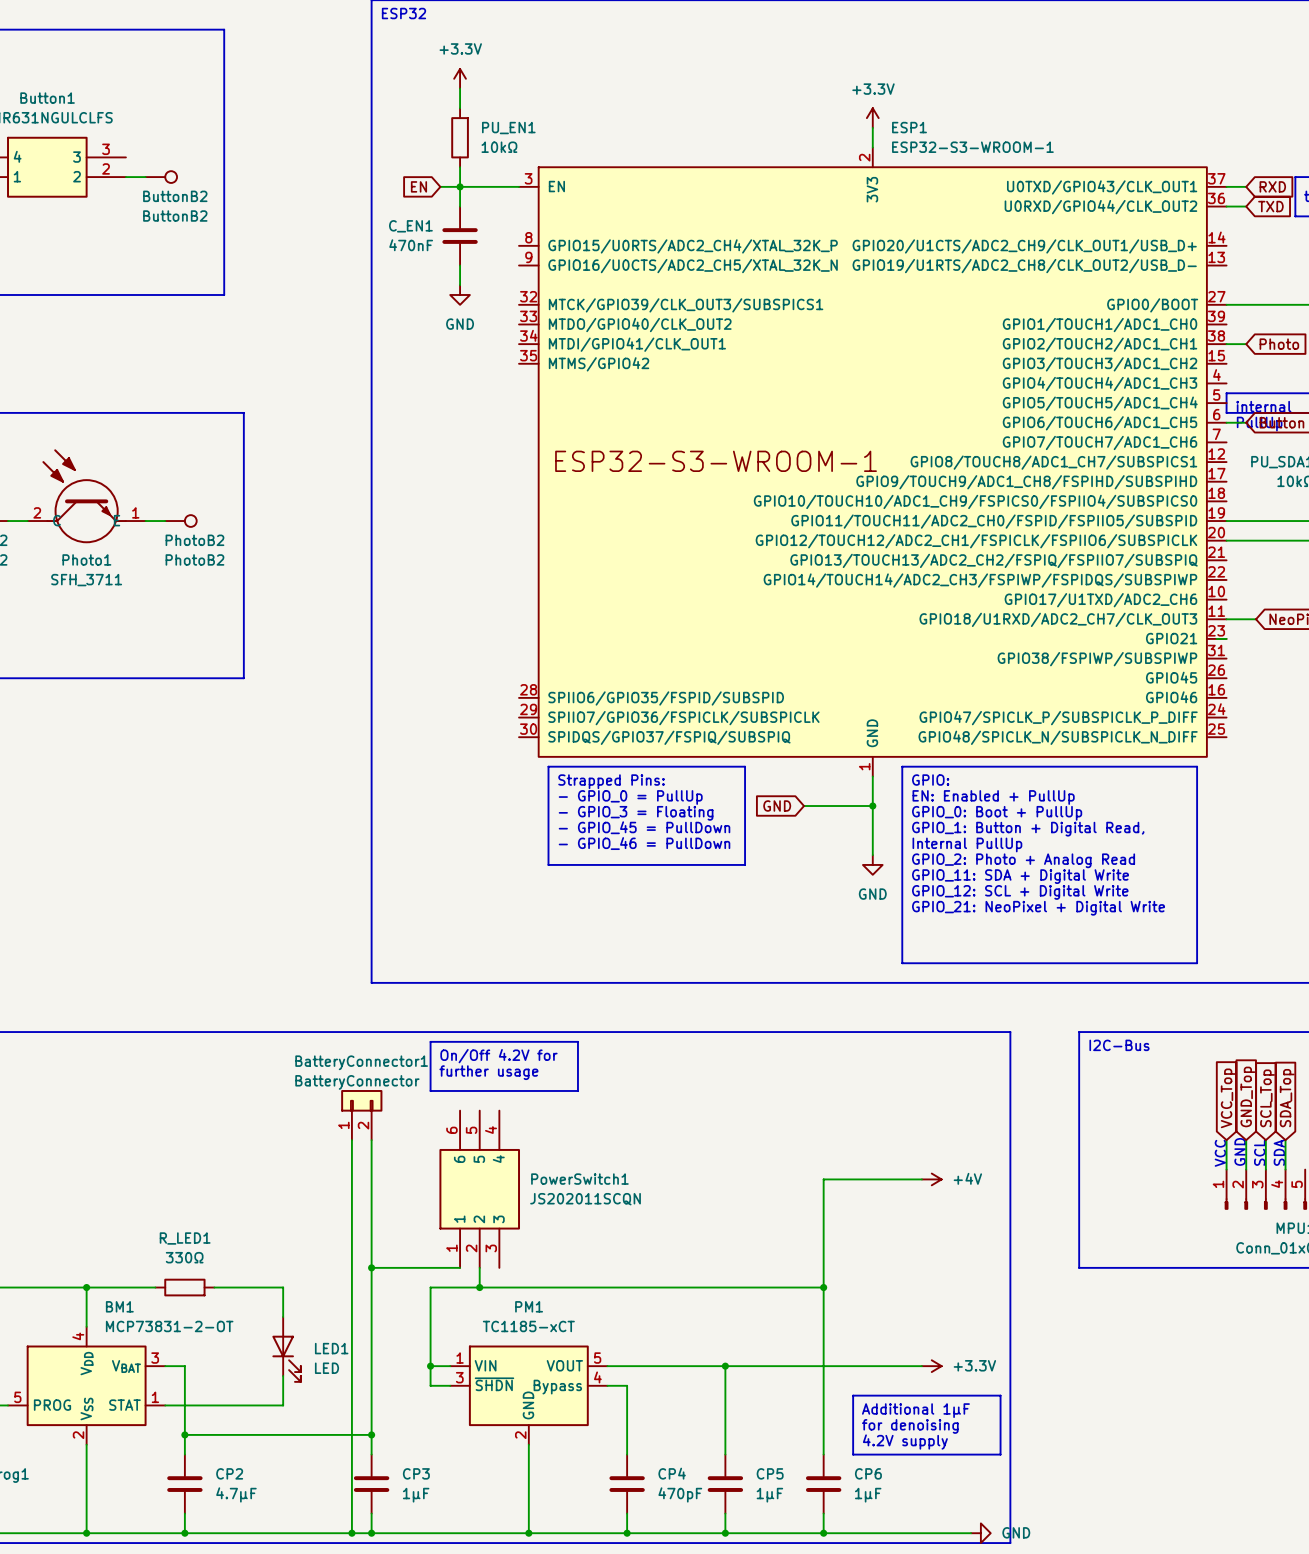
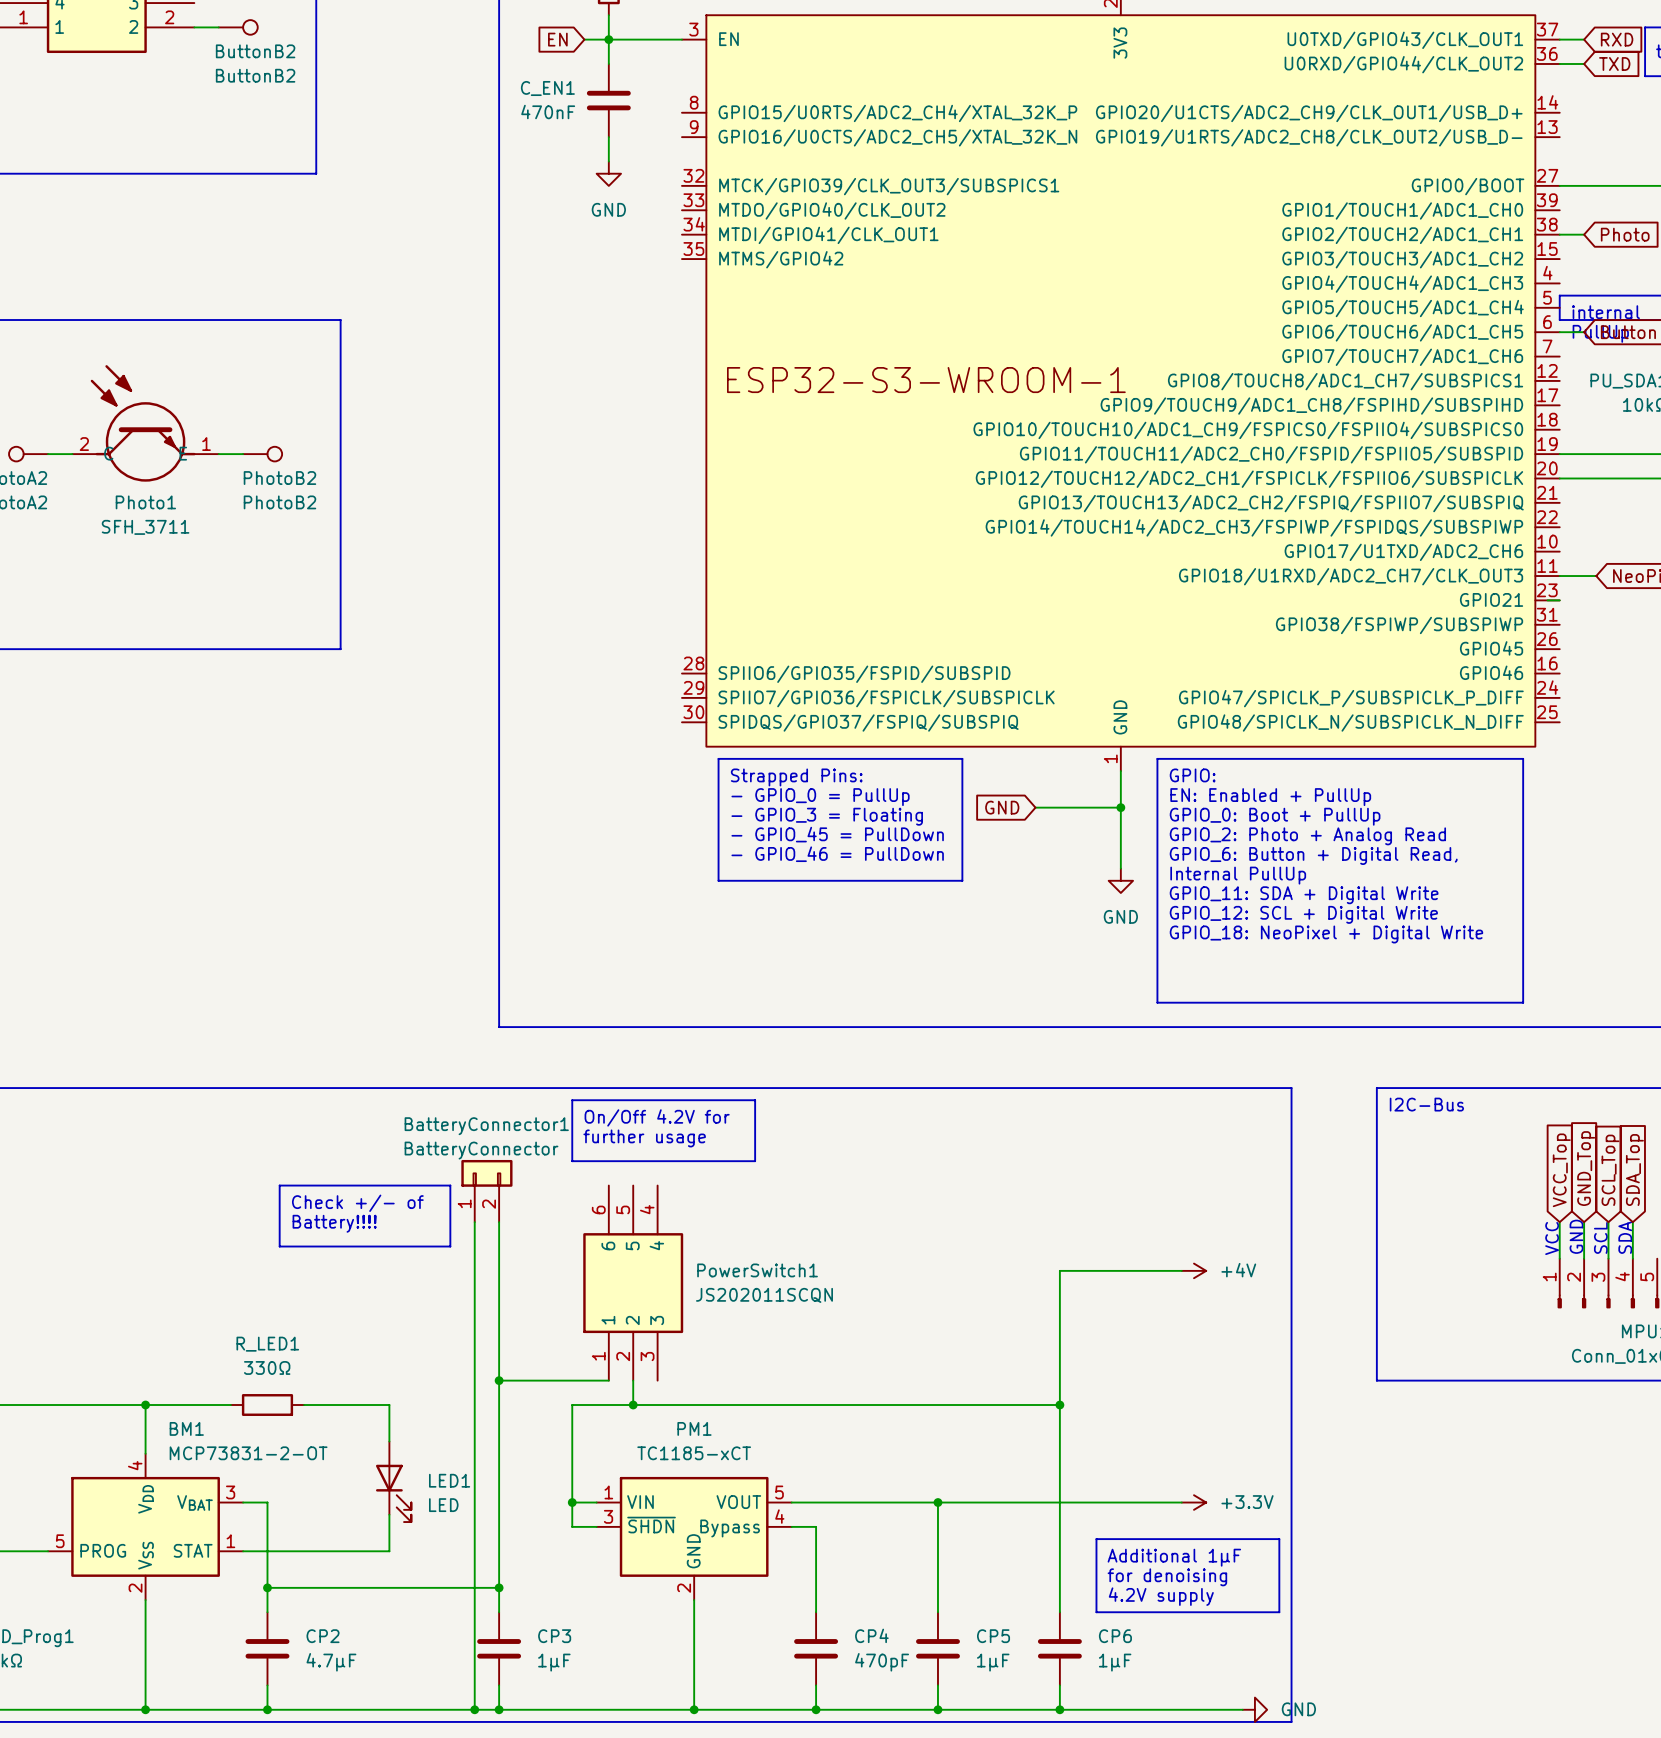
text: GPIO_1: Button + Digital Read, (1028, 829) -> GPIO_2: Photo + Analog Read (1307, 836)
text: Internal PullUp (967, 844) -> GPIO_6: Button + Digital Read, (1313, 855)
text: GPIO_2: Photo + Analog Read (1023, 860) -> Internal PullUp (1238, 875)
text: GPIO_21: NeoPixel + Digital Write (1038, 908) -> GPIO_18: NeoPixel + Digital Write (1326, 934)
line: none -> (279, 1185) (450, 1185) (450, 1246) (279, 1246) (279, 1185)
text: none -> Check +/- of (357, 1203)
text: none -> Battery!!!! (334, 1223)

